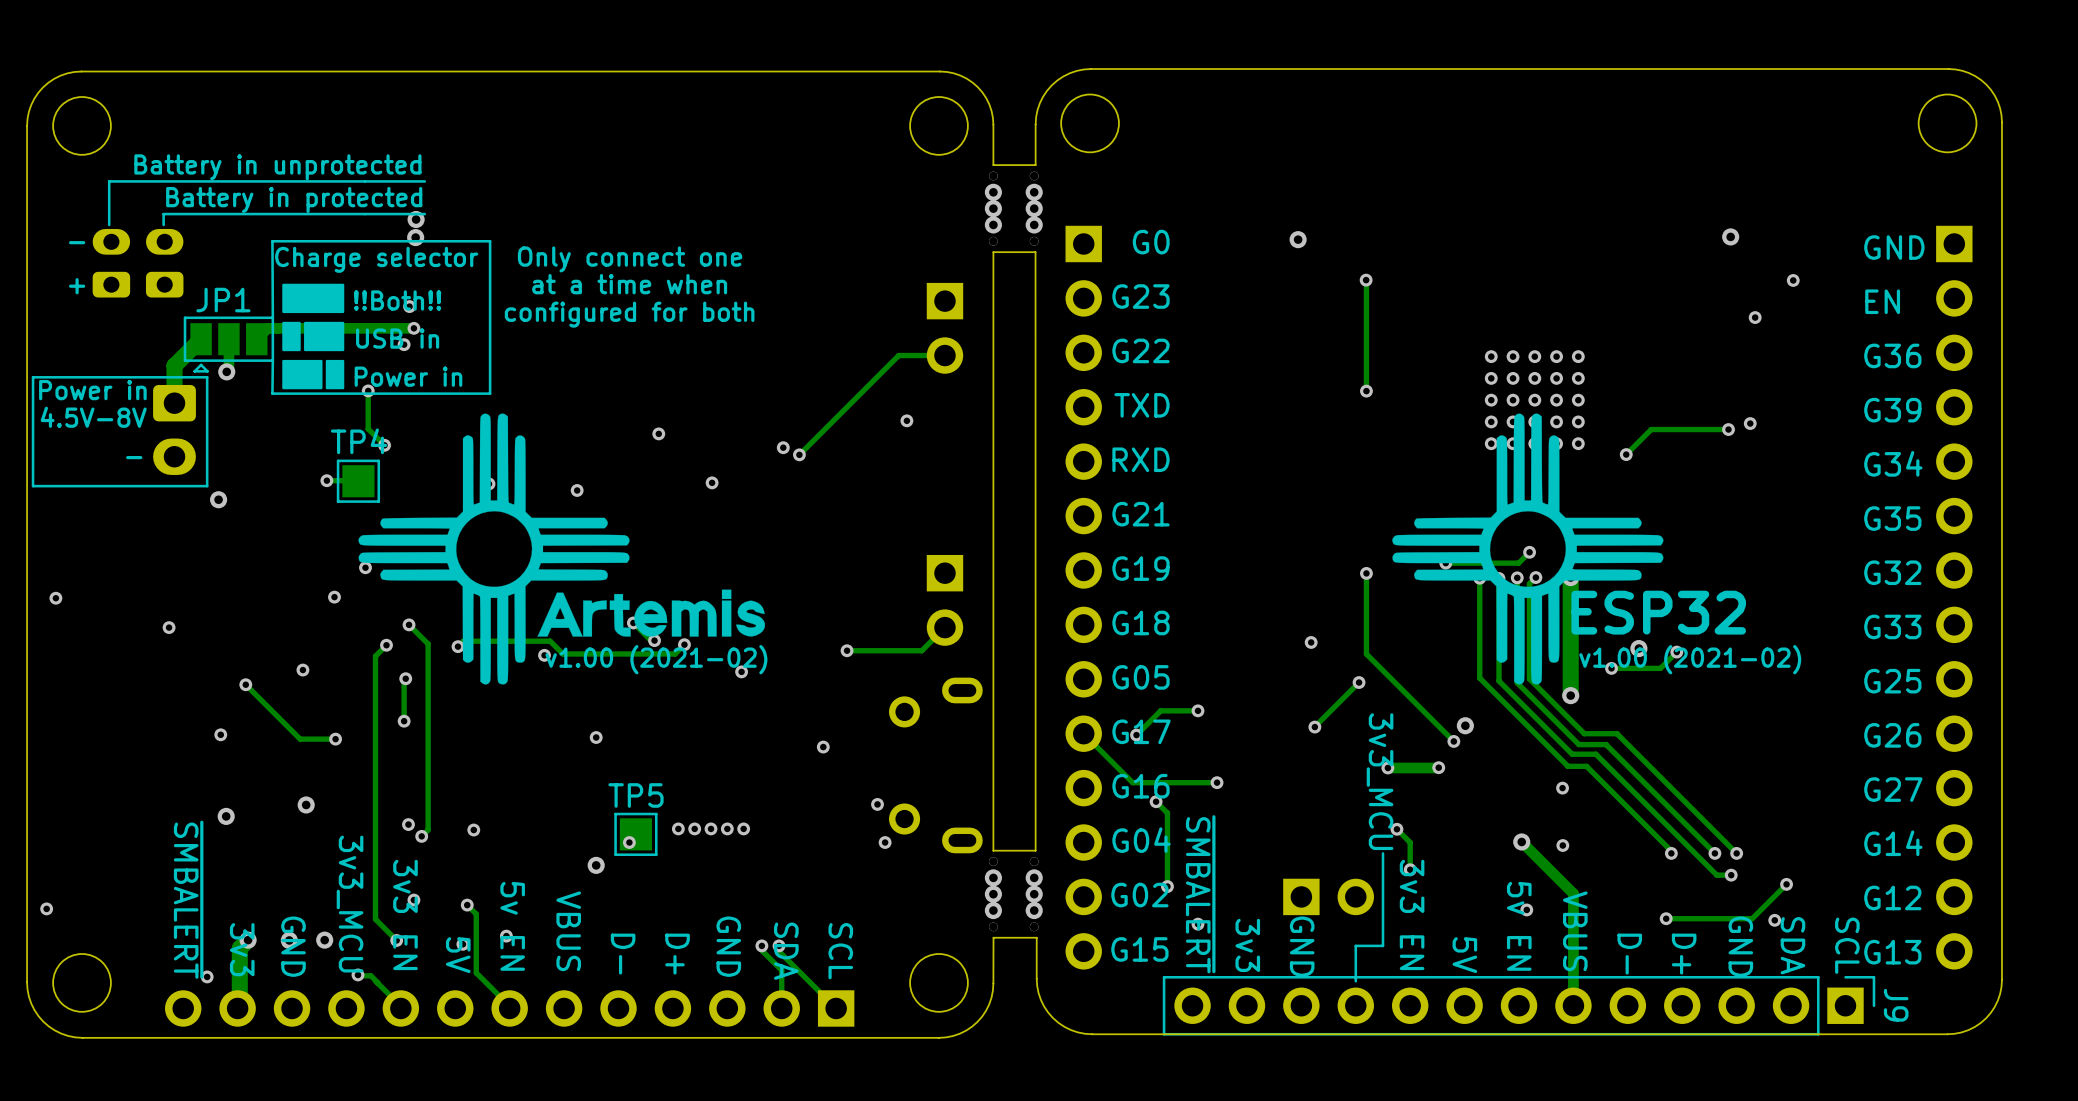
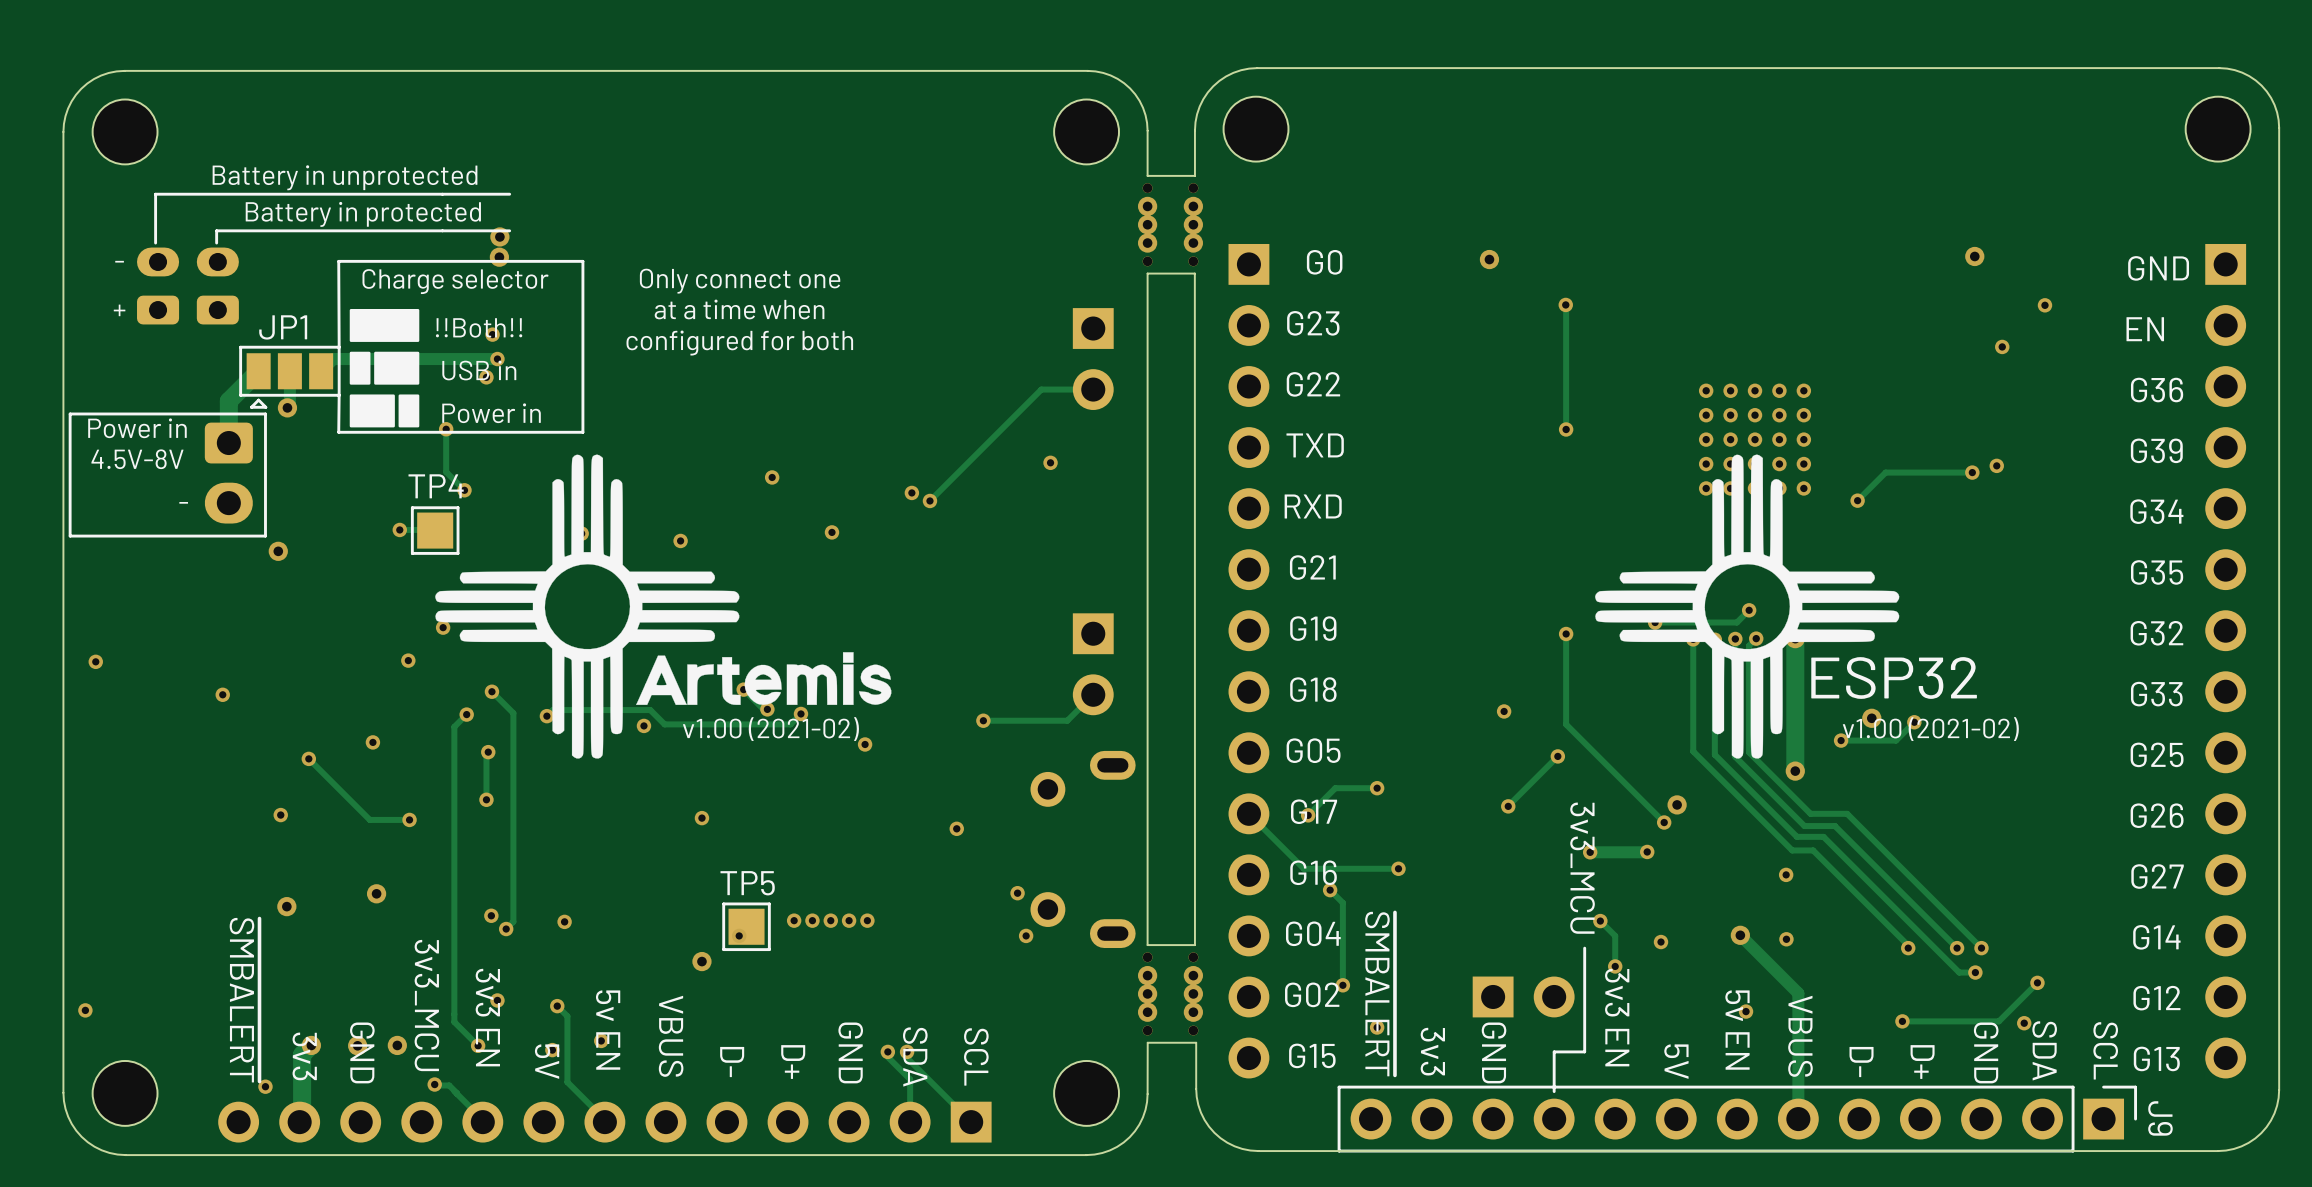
via: none -> (1661, 942)

